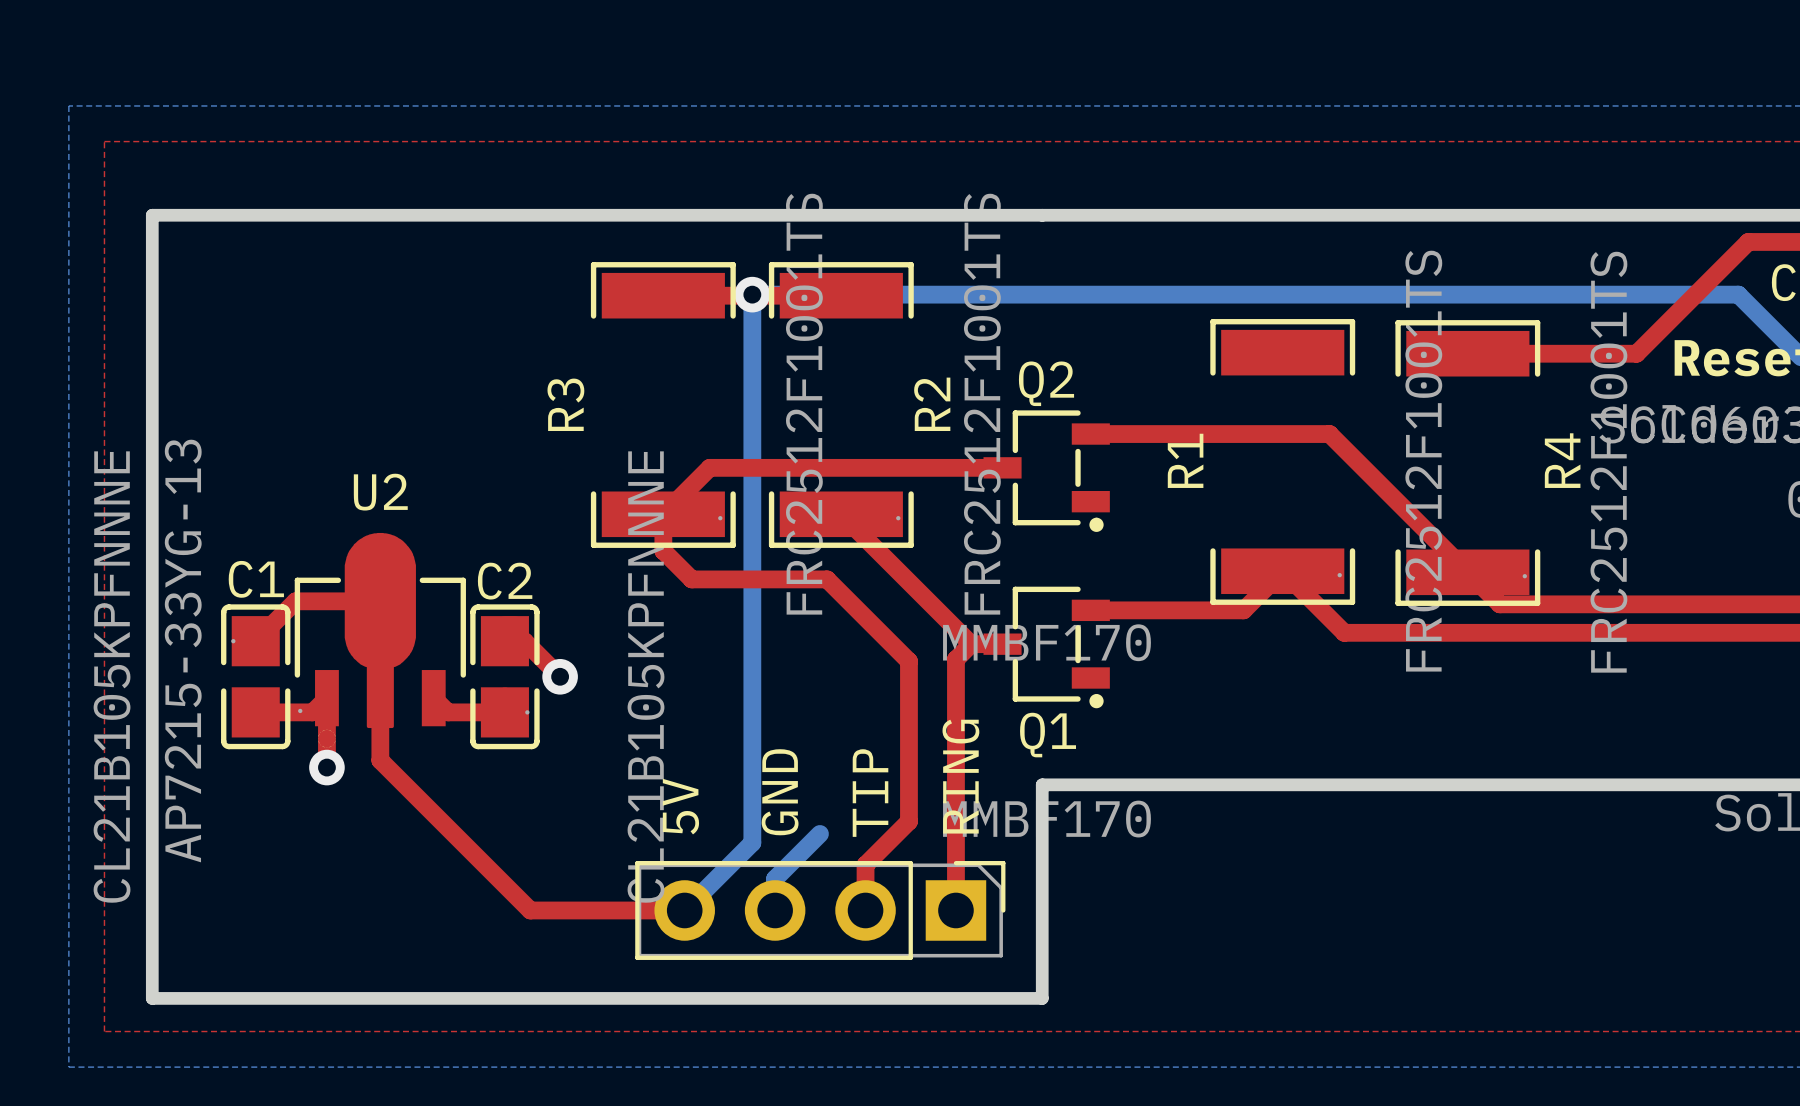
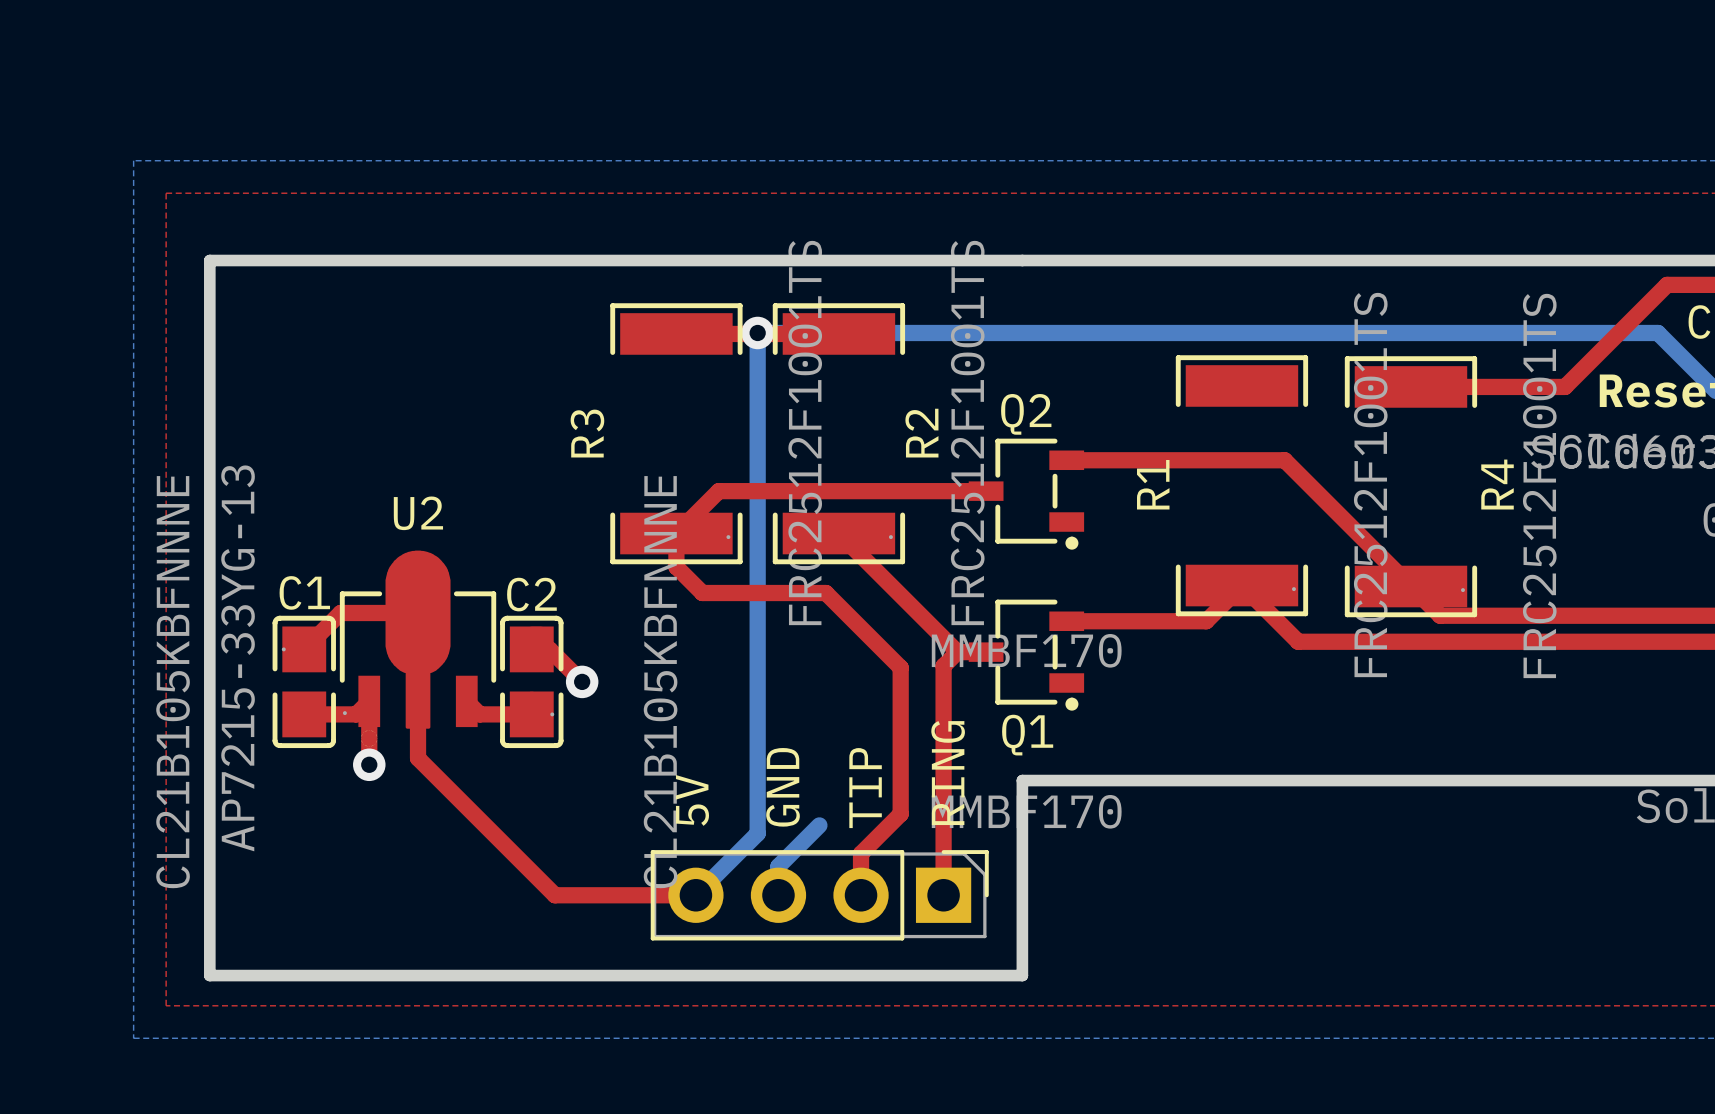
C1 value: CL21B105KPFNNNE (112, 677) -> CL21B105KBFNNNE (173, 682)
C2 value: CL21B105KPFNNNE (645, 677) -> CL21B105KBFNNNE (660, 682)

